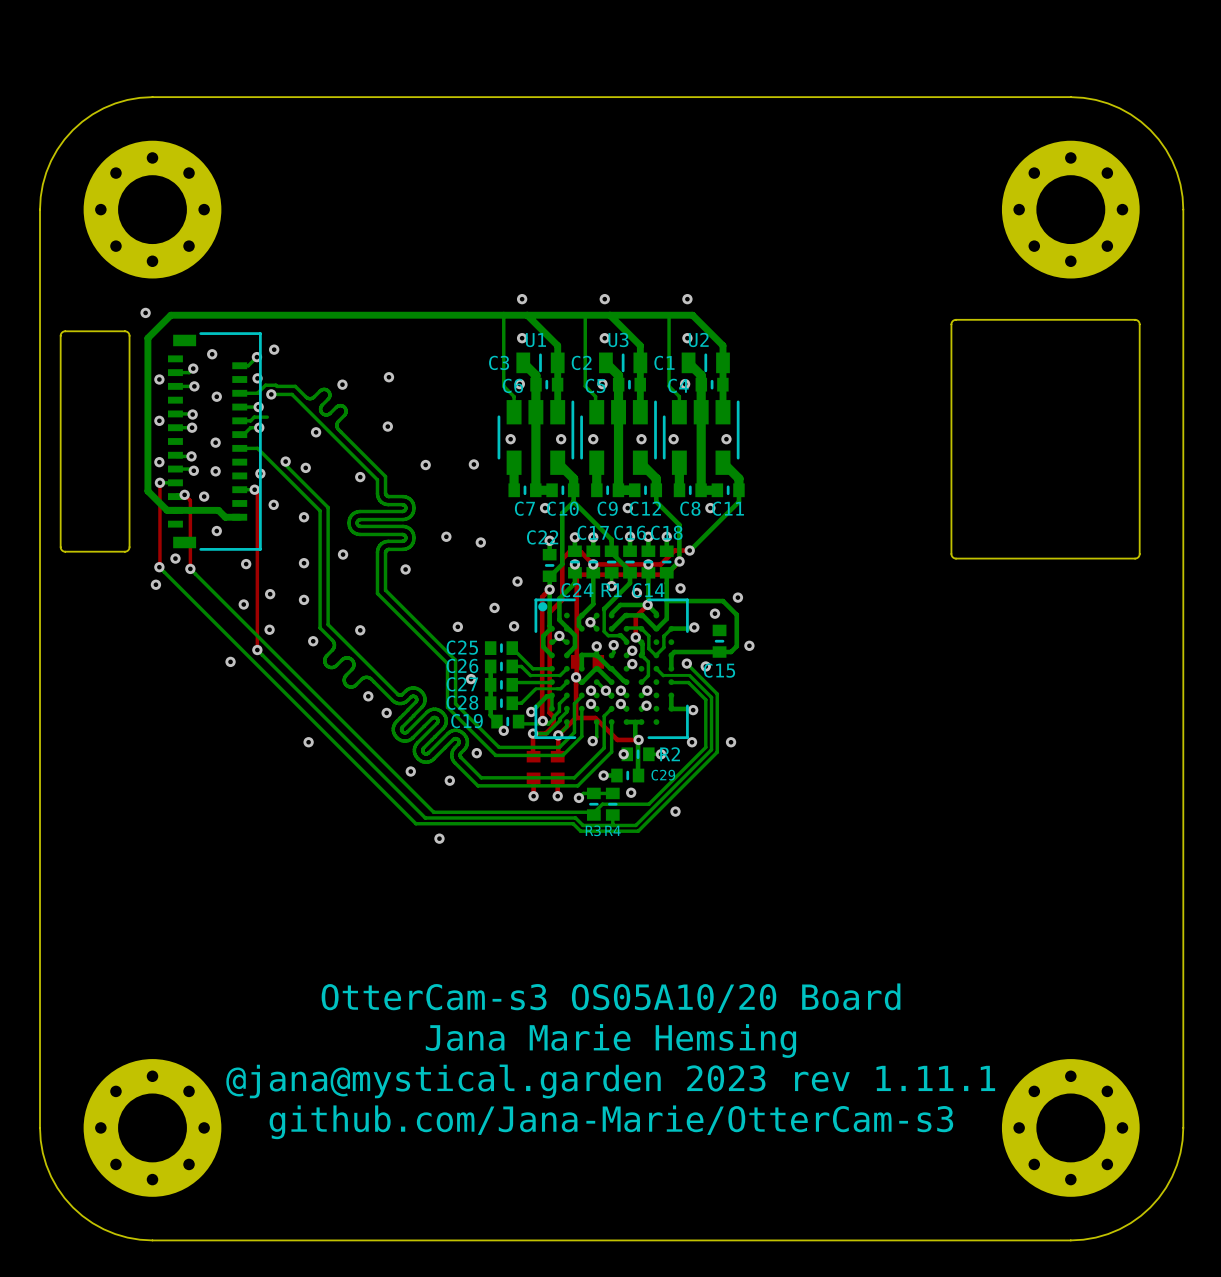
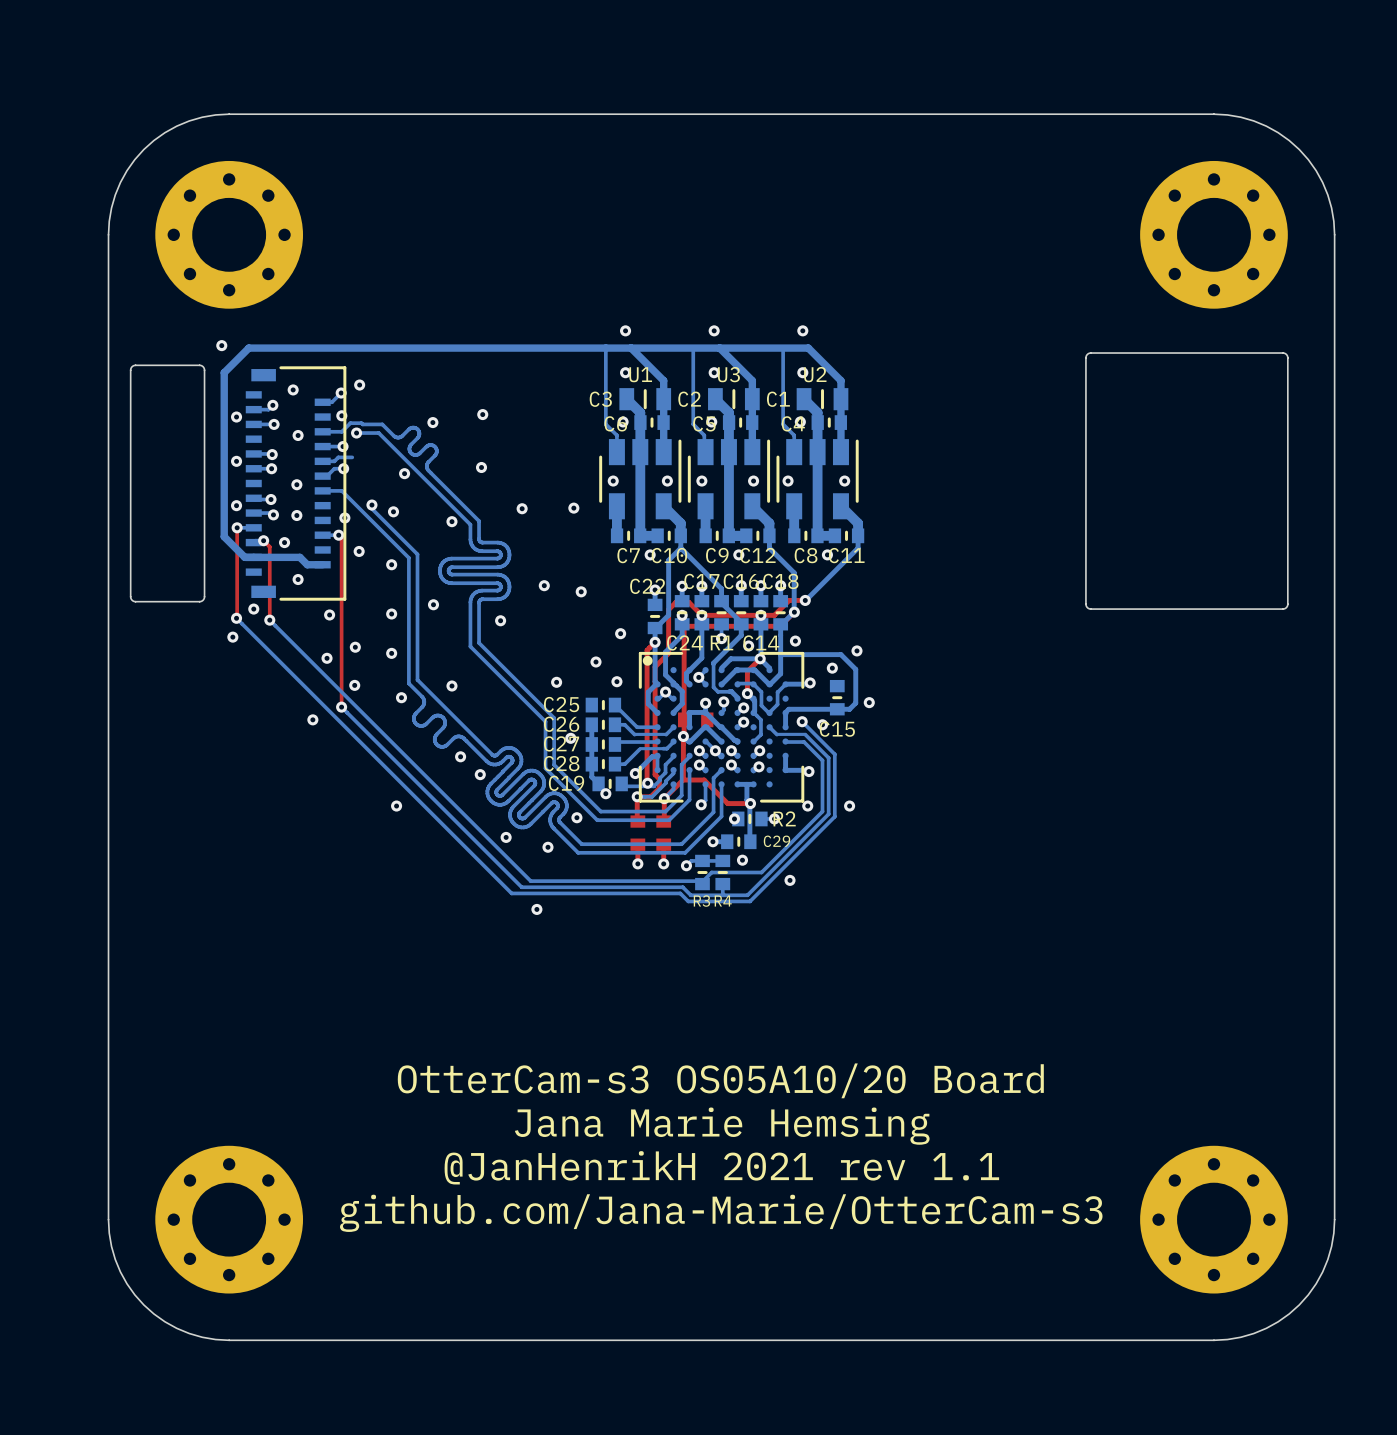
text: @jana@mystical.garden 2023 rev 1.11.1 (610, 1081) -> @JanHenrikH 2021 rev 1.1 (721, 1167)

